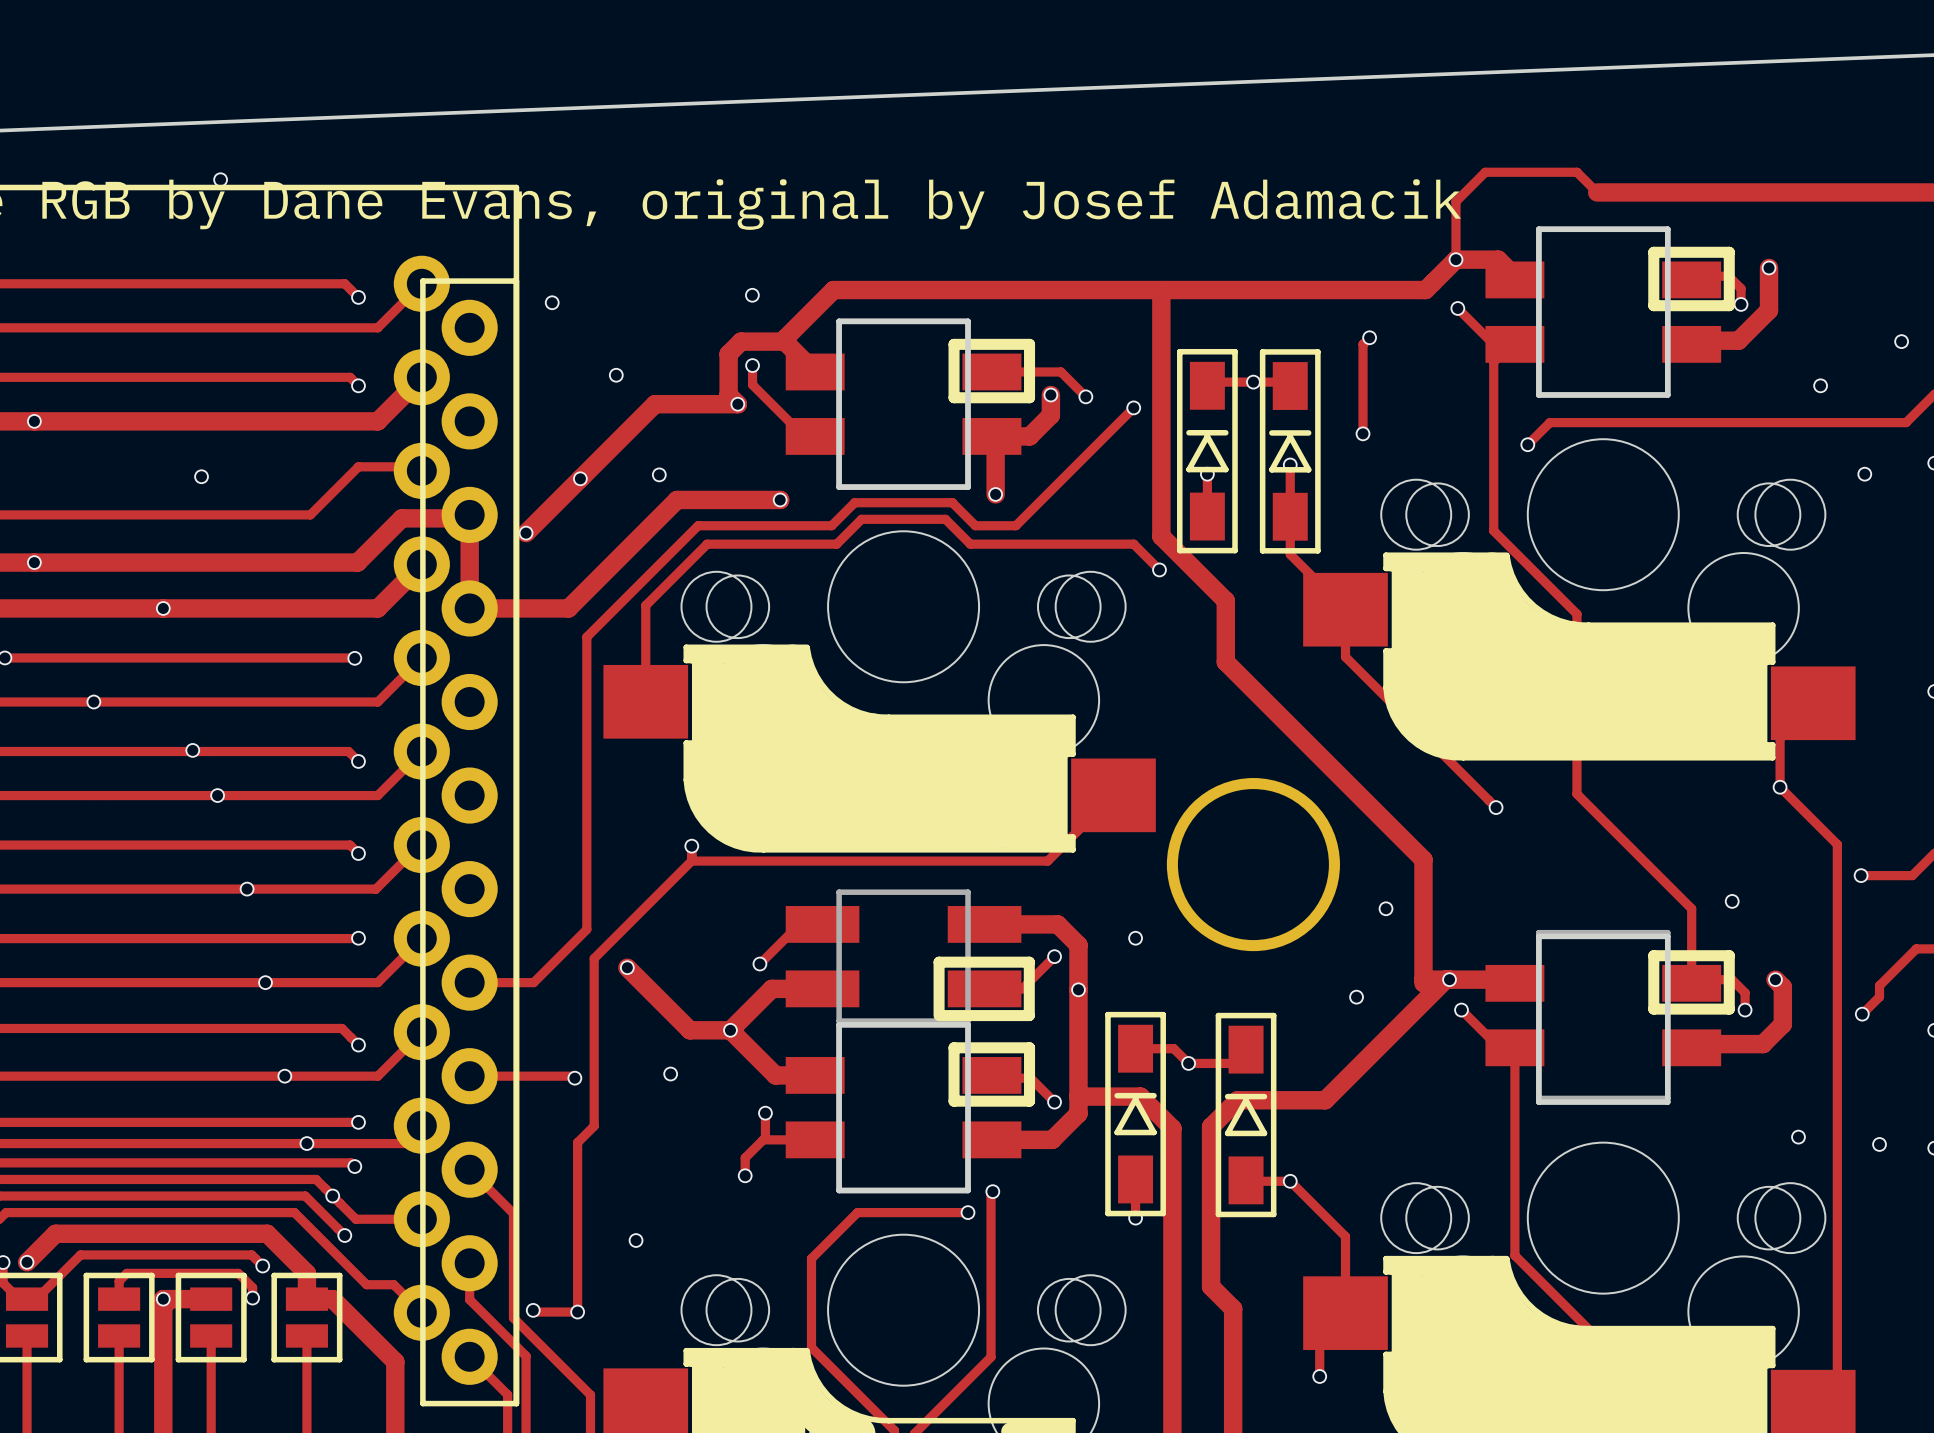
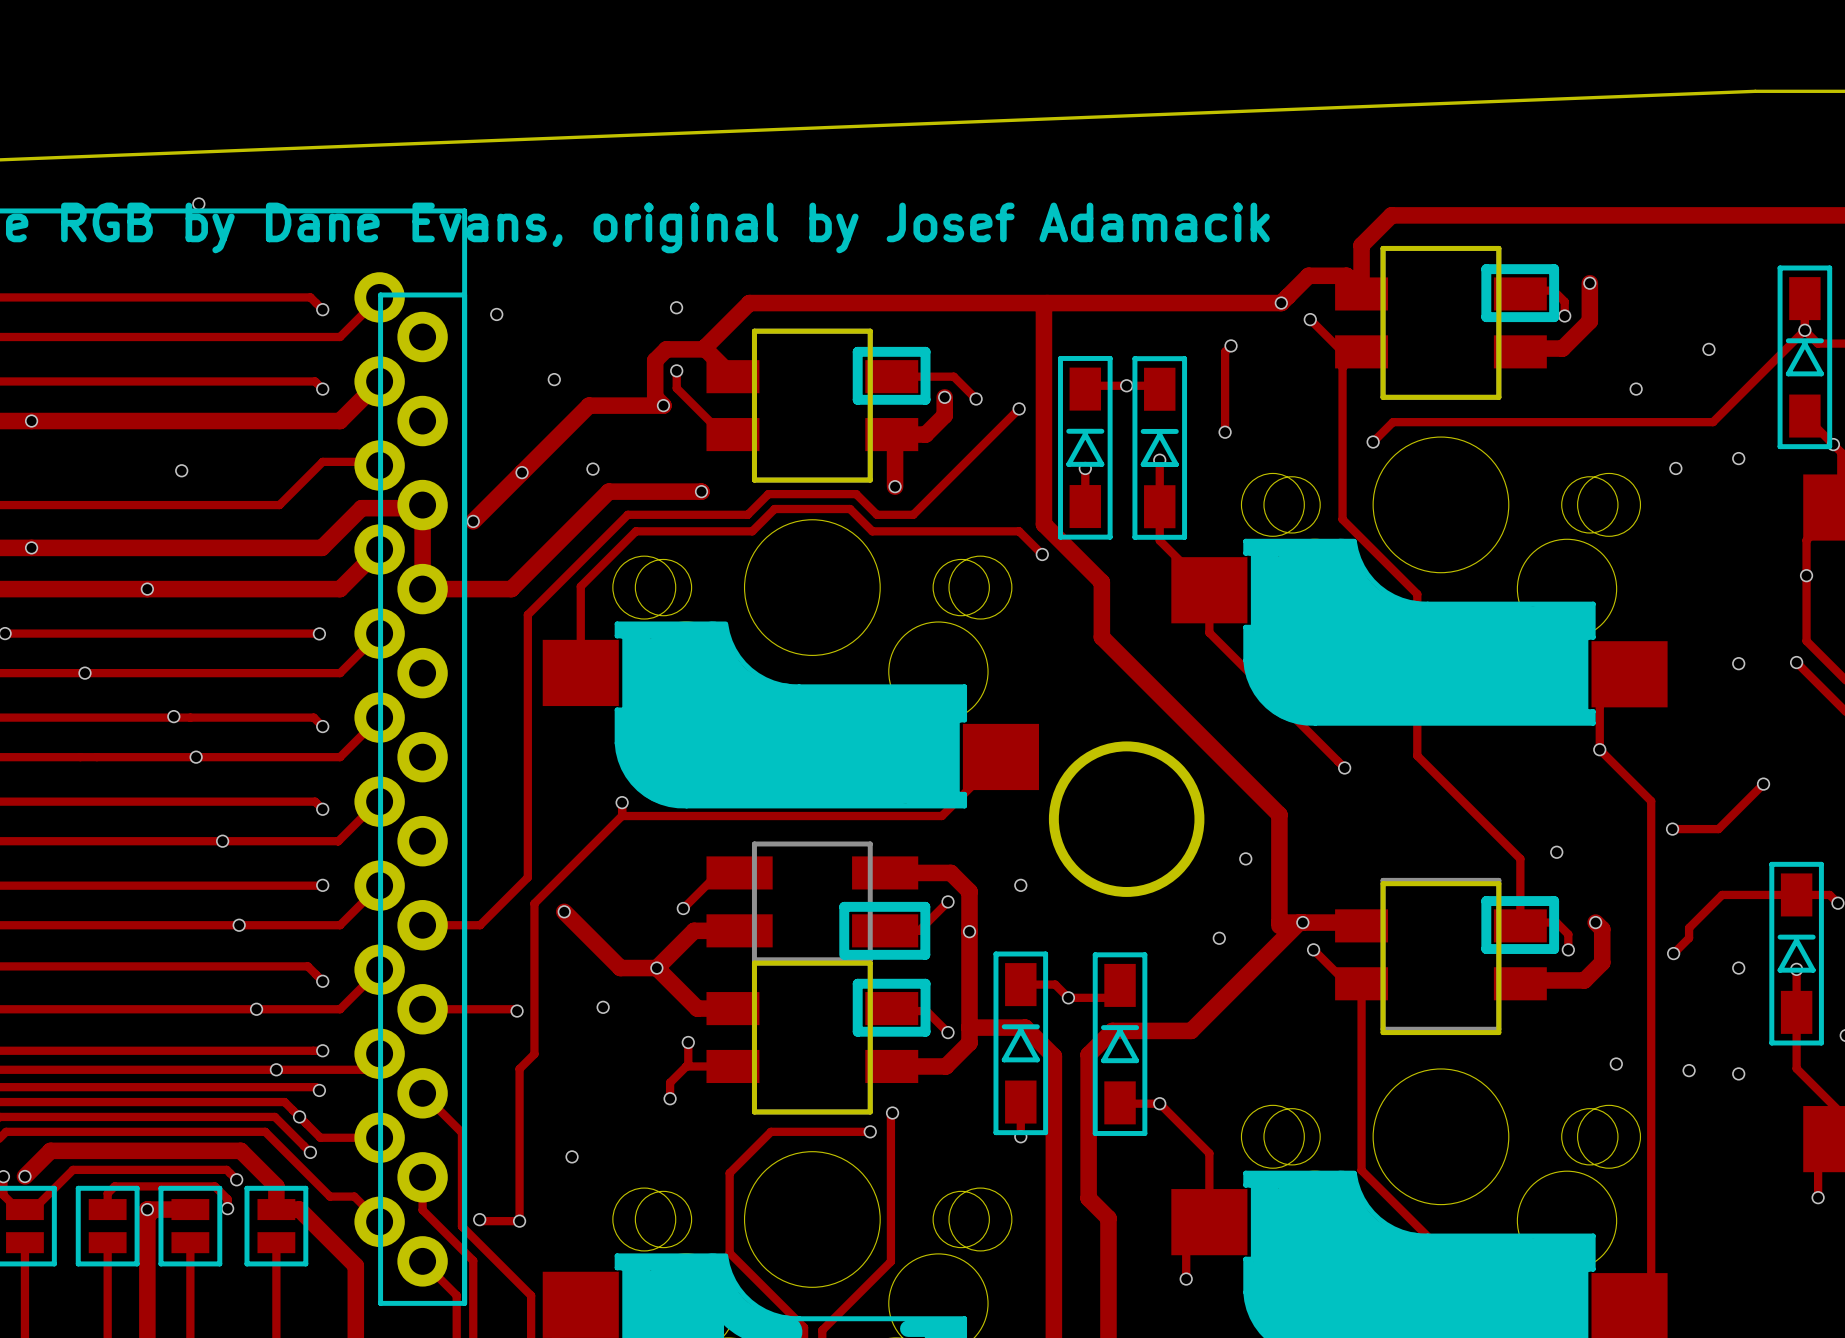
track: (1597, 192) (1576, 172) (1485, 172) (1455, 201) (1455, 259) -> (1435, 215) (1391, 215) (1361, 245) (1361, 293)
via position: (1455, 259) -> (1281, 303)

